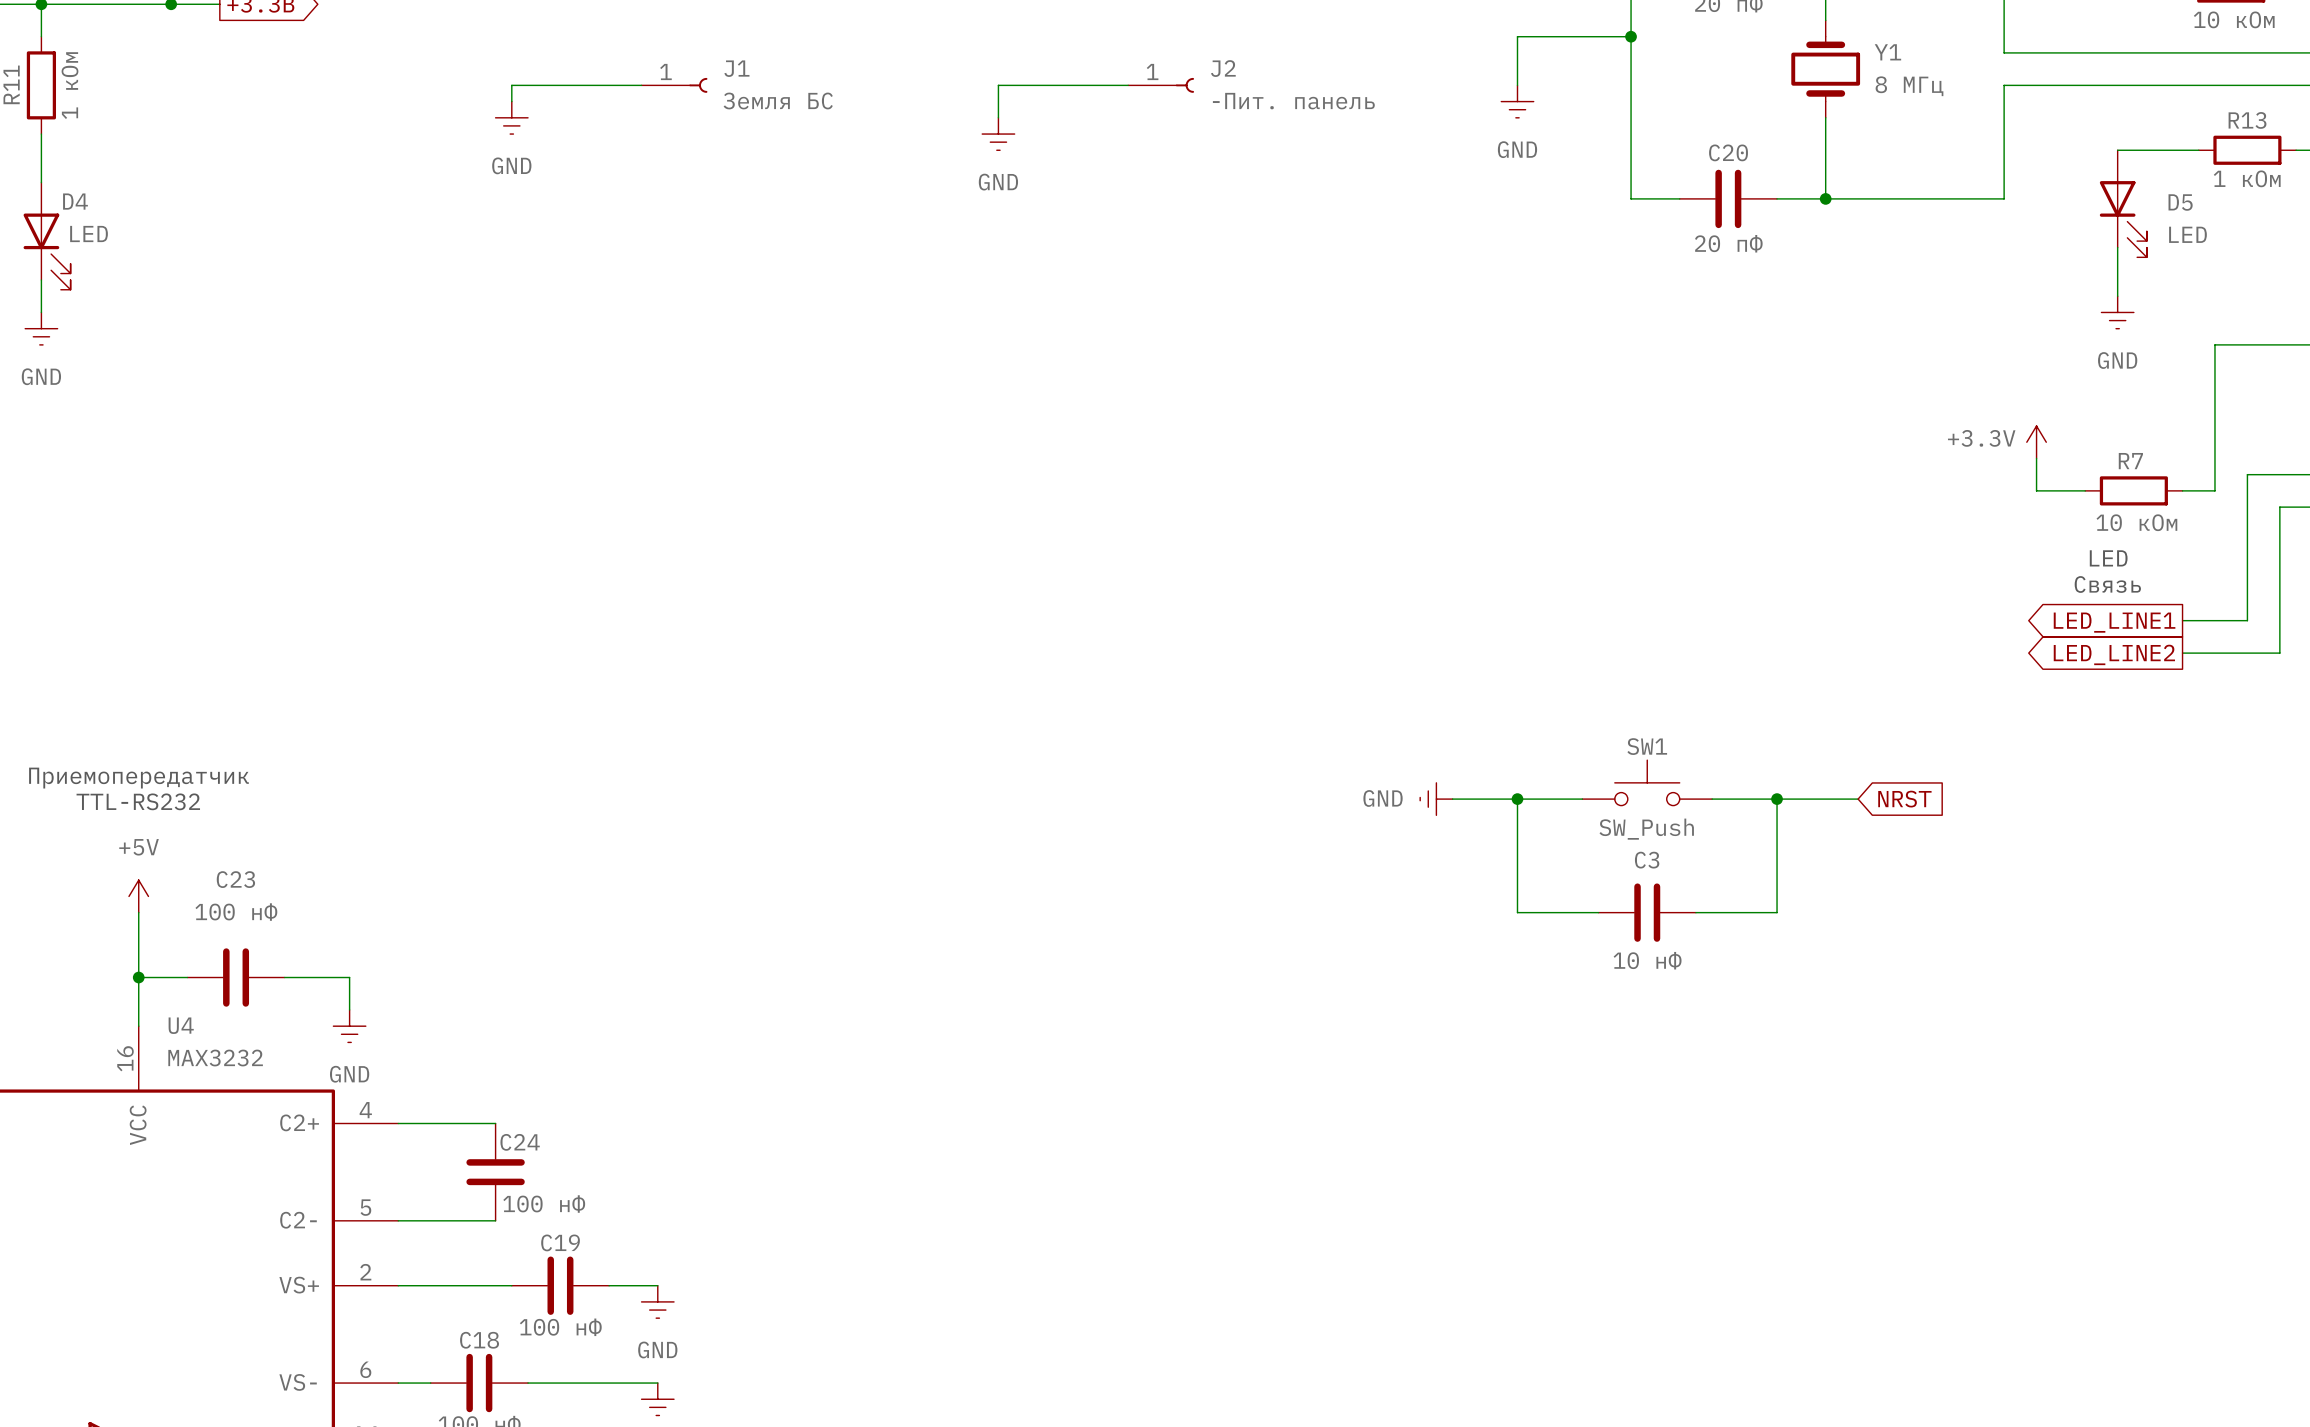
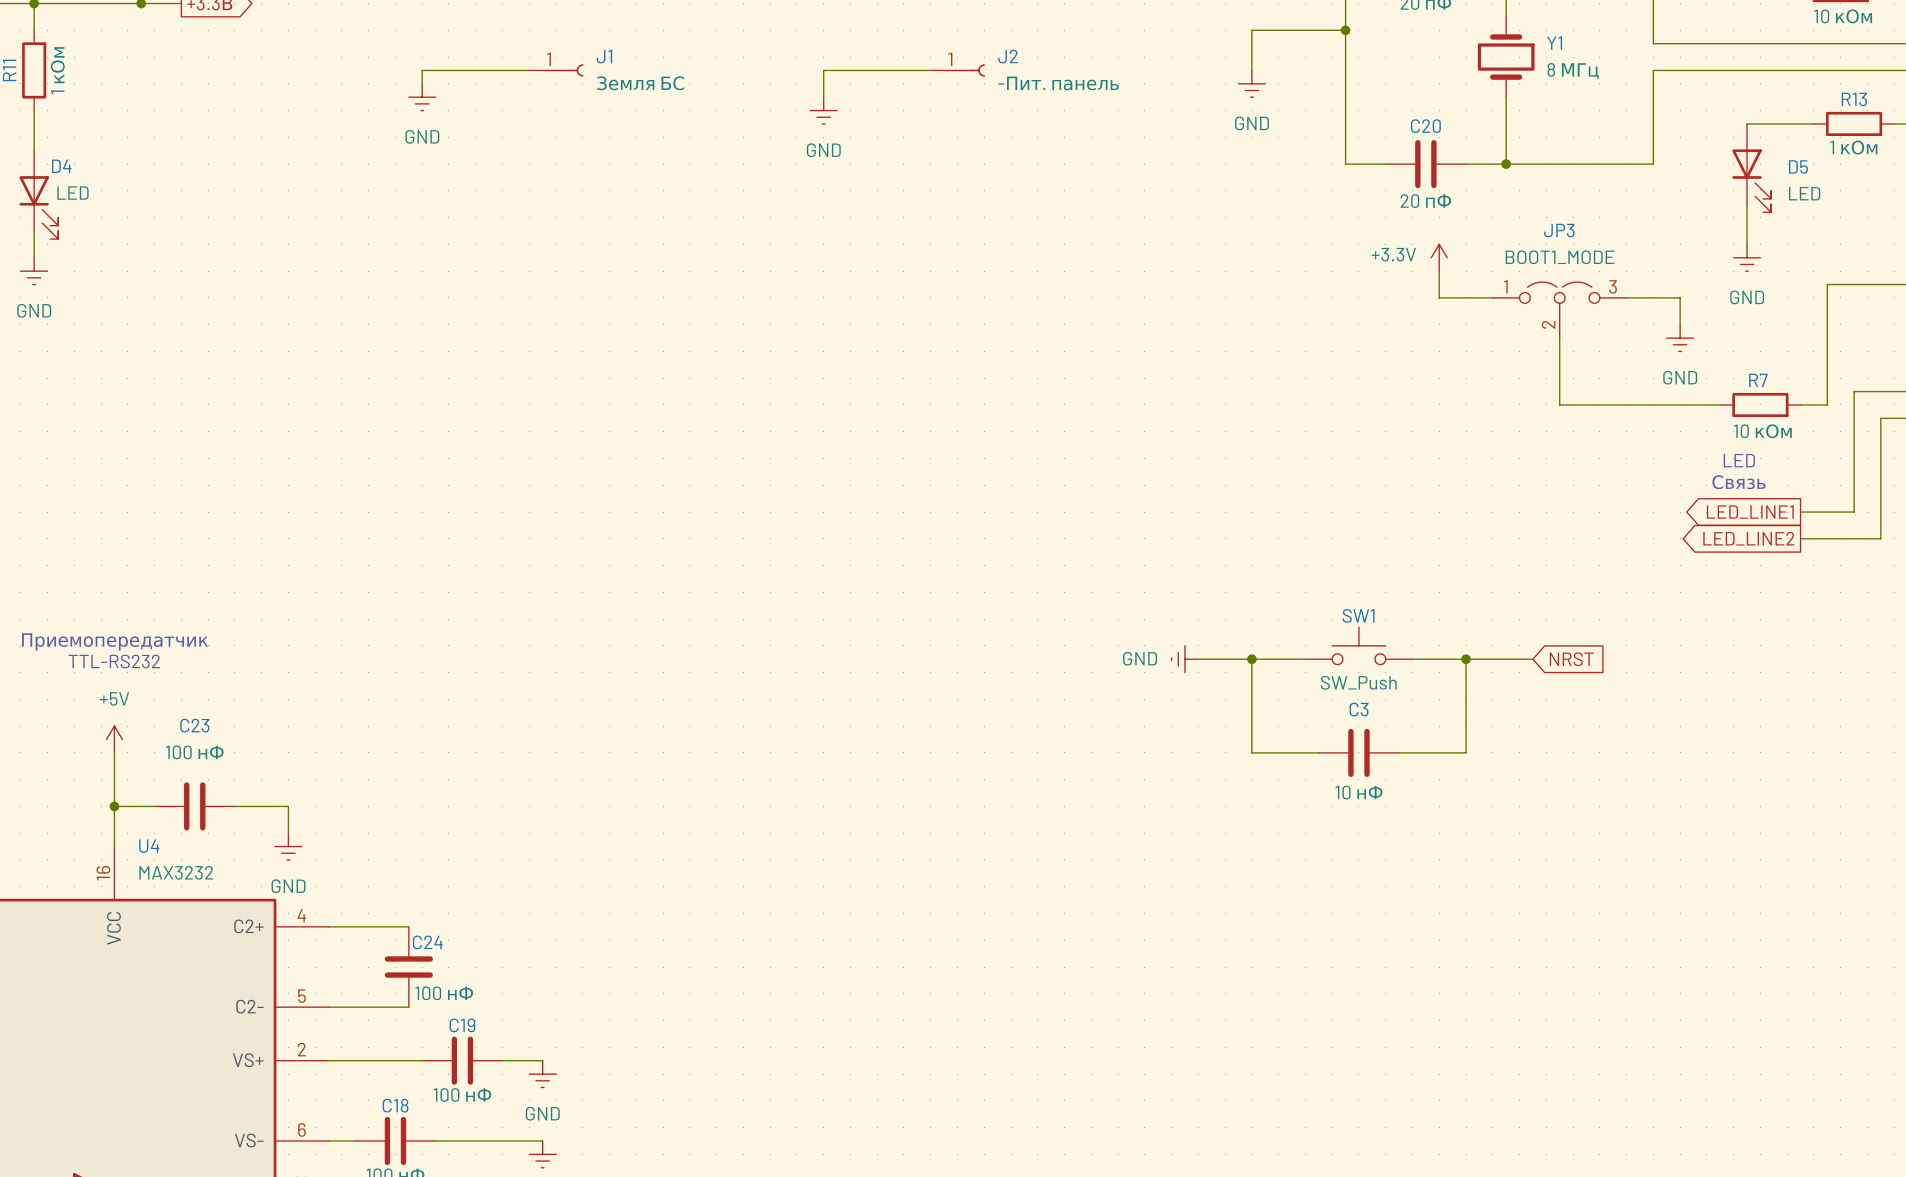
power symbol: none -> +3.3V (1439, 257)
wire: none -> (1439, 271) (1439, 297) (1492, 297)
wire: none -> (1626, 297) (1680, 297) (1680, 324)
JP3: none -> BOOT1_MODE (1559, 310)
power symbol: none -> GND (1680, 338)
power symbol: +3.3V (2036, 442) -> none
wire: (2036, 458) (2036, 490) -> (1559, 338) (1559, 404) (1680, 404)

